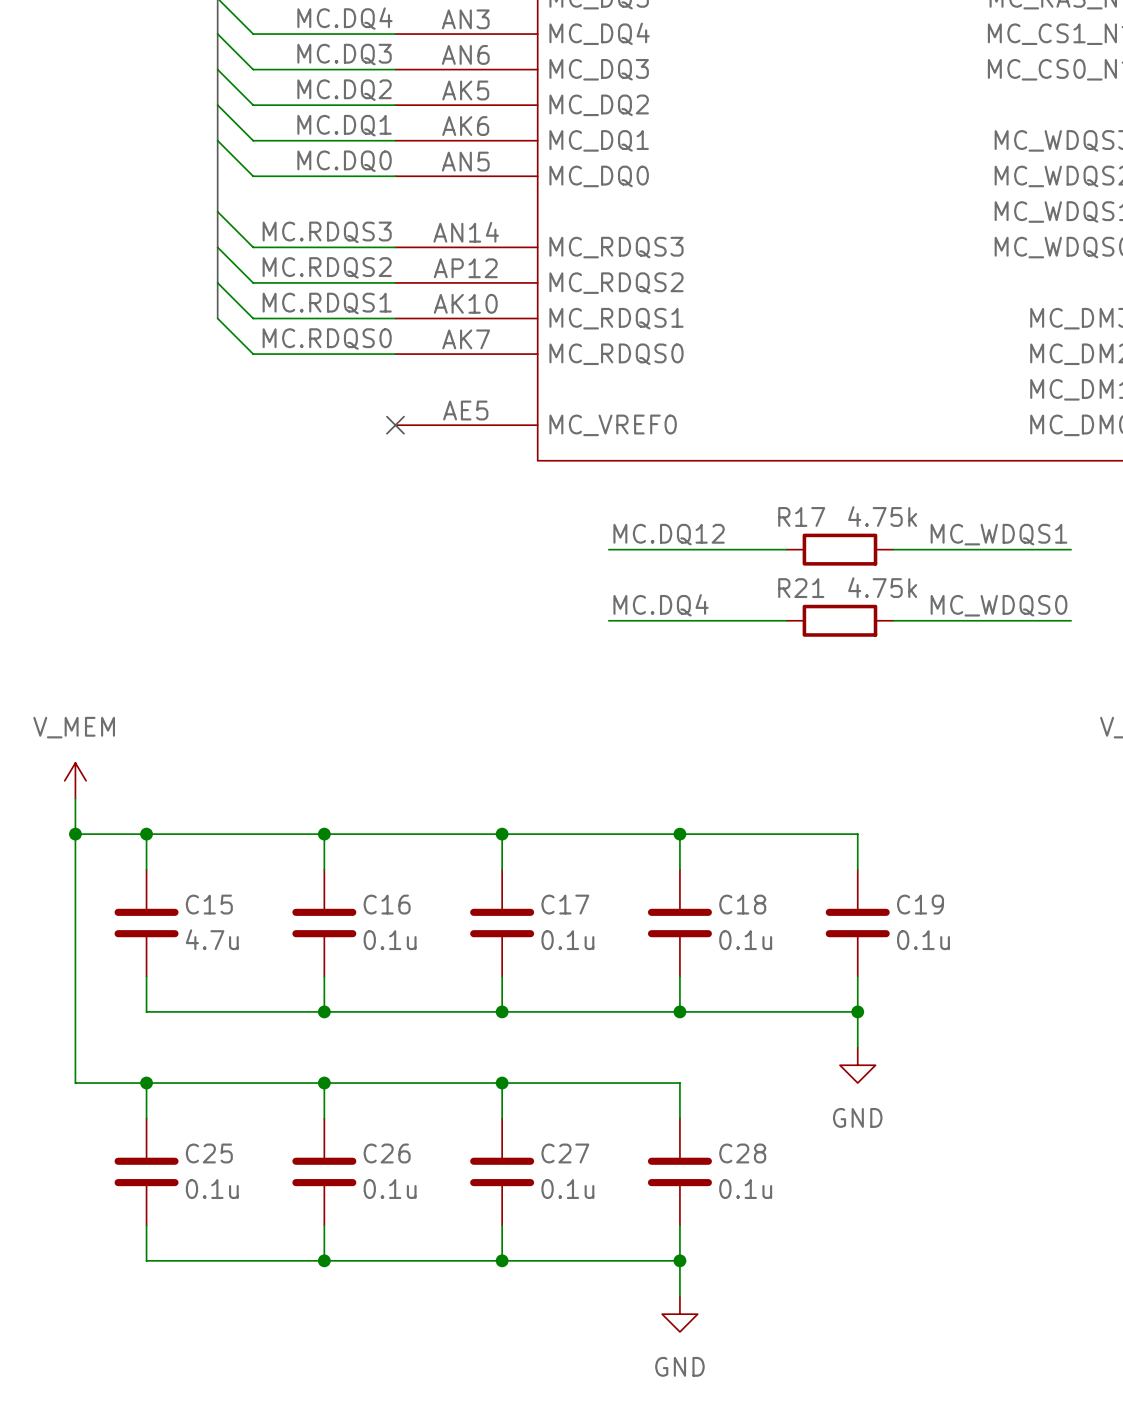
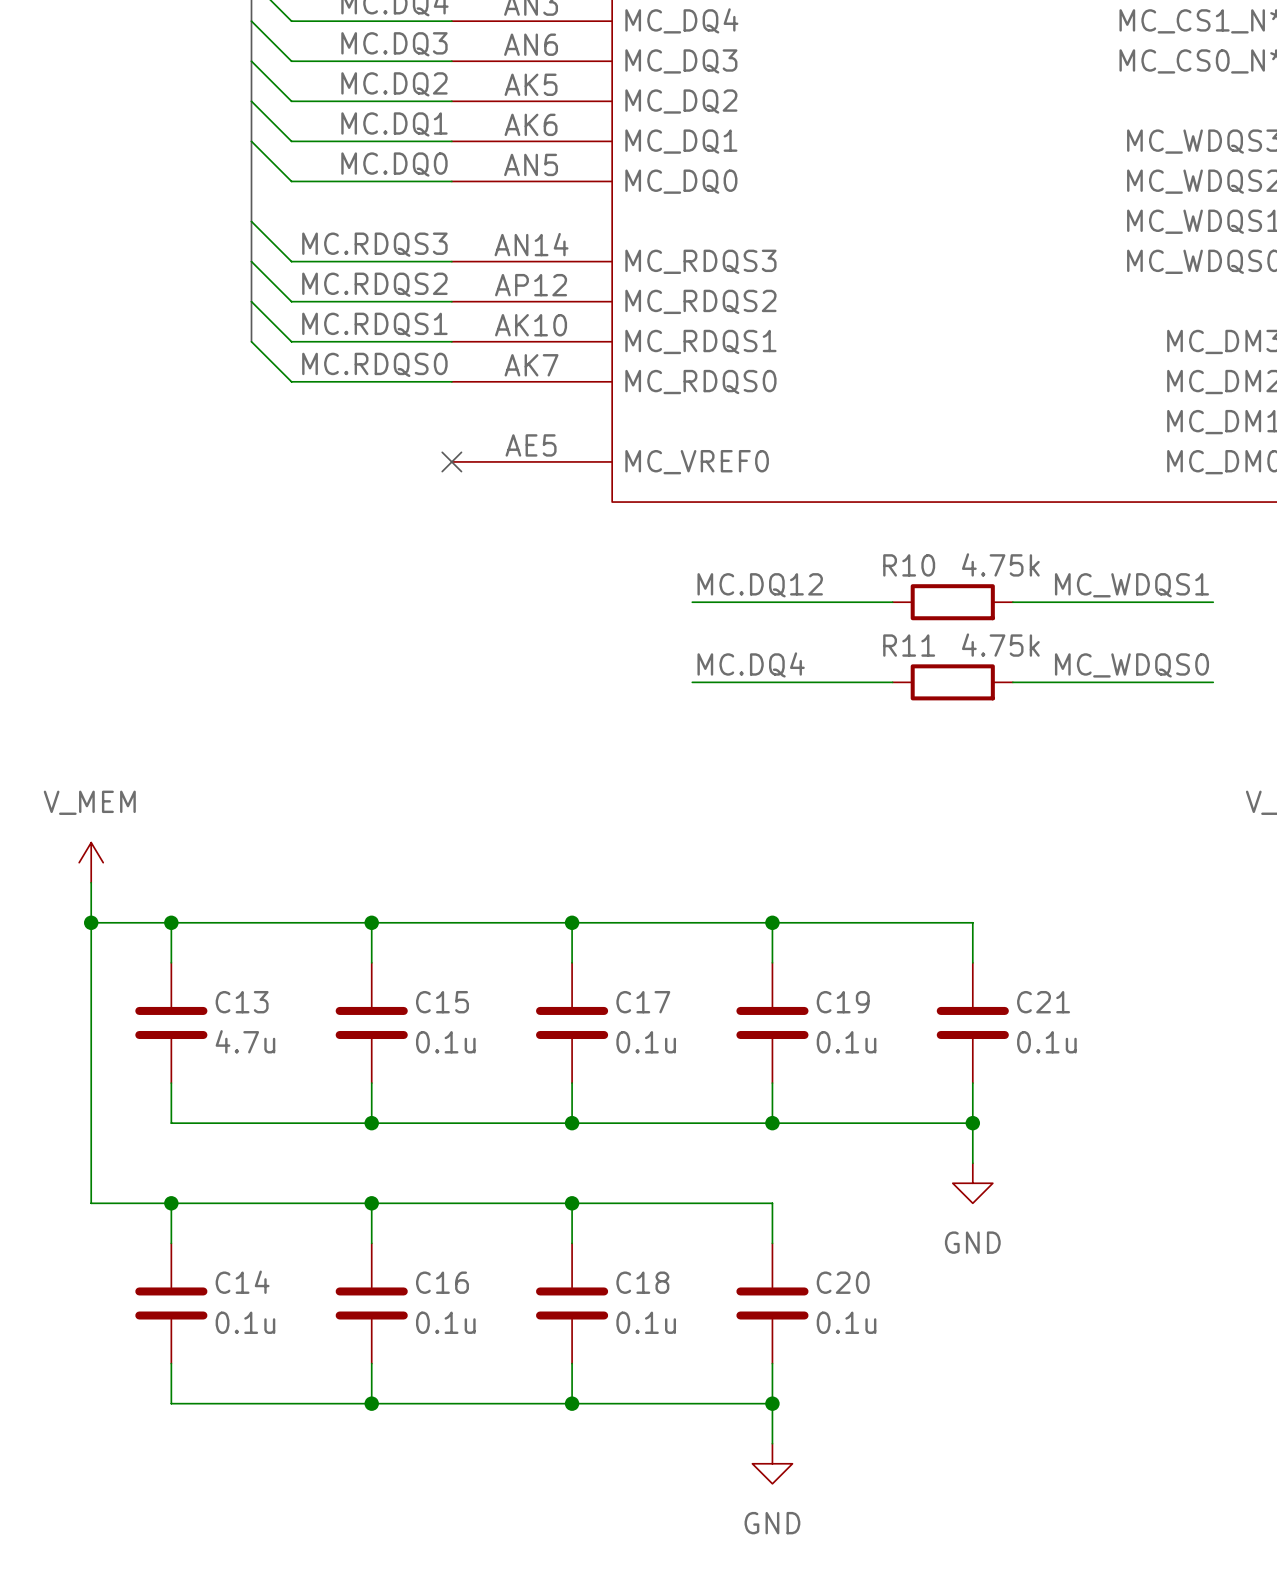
R17 name: R17 (801, 516) -> R10 (909, 565)
R21 name: R21 (801, 588) -> R11 (909, 645)
C15 name: C15 (209, 904) -> C13 (242, 1002)
C16 name: C16 (387, 904) -> C15 (442, 1002)
C18 name: C18 (742, 904) -> C19 (843, 1002)
C19 name: C19 (920, 904) -> C21 (1043, 1002)
C25 name: C25 (209, 1153) -> C14 (242, 1282)
C26 name: C26 (387, 1153) -> C16 (442, 1282)
C27 name: C27 (565, 1153) -> C18 (642, 1282)
C28 name: C28 (742, 1153) -> C20 (843, 1282)

